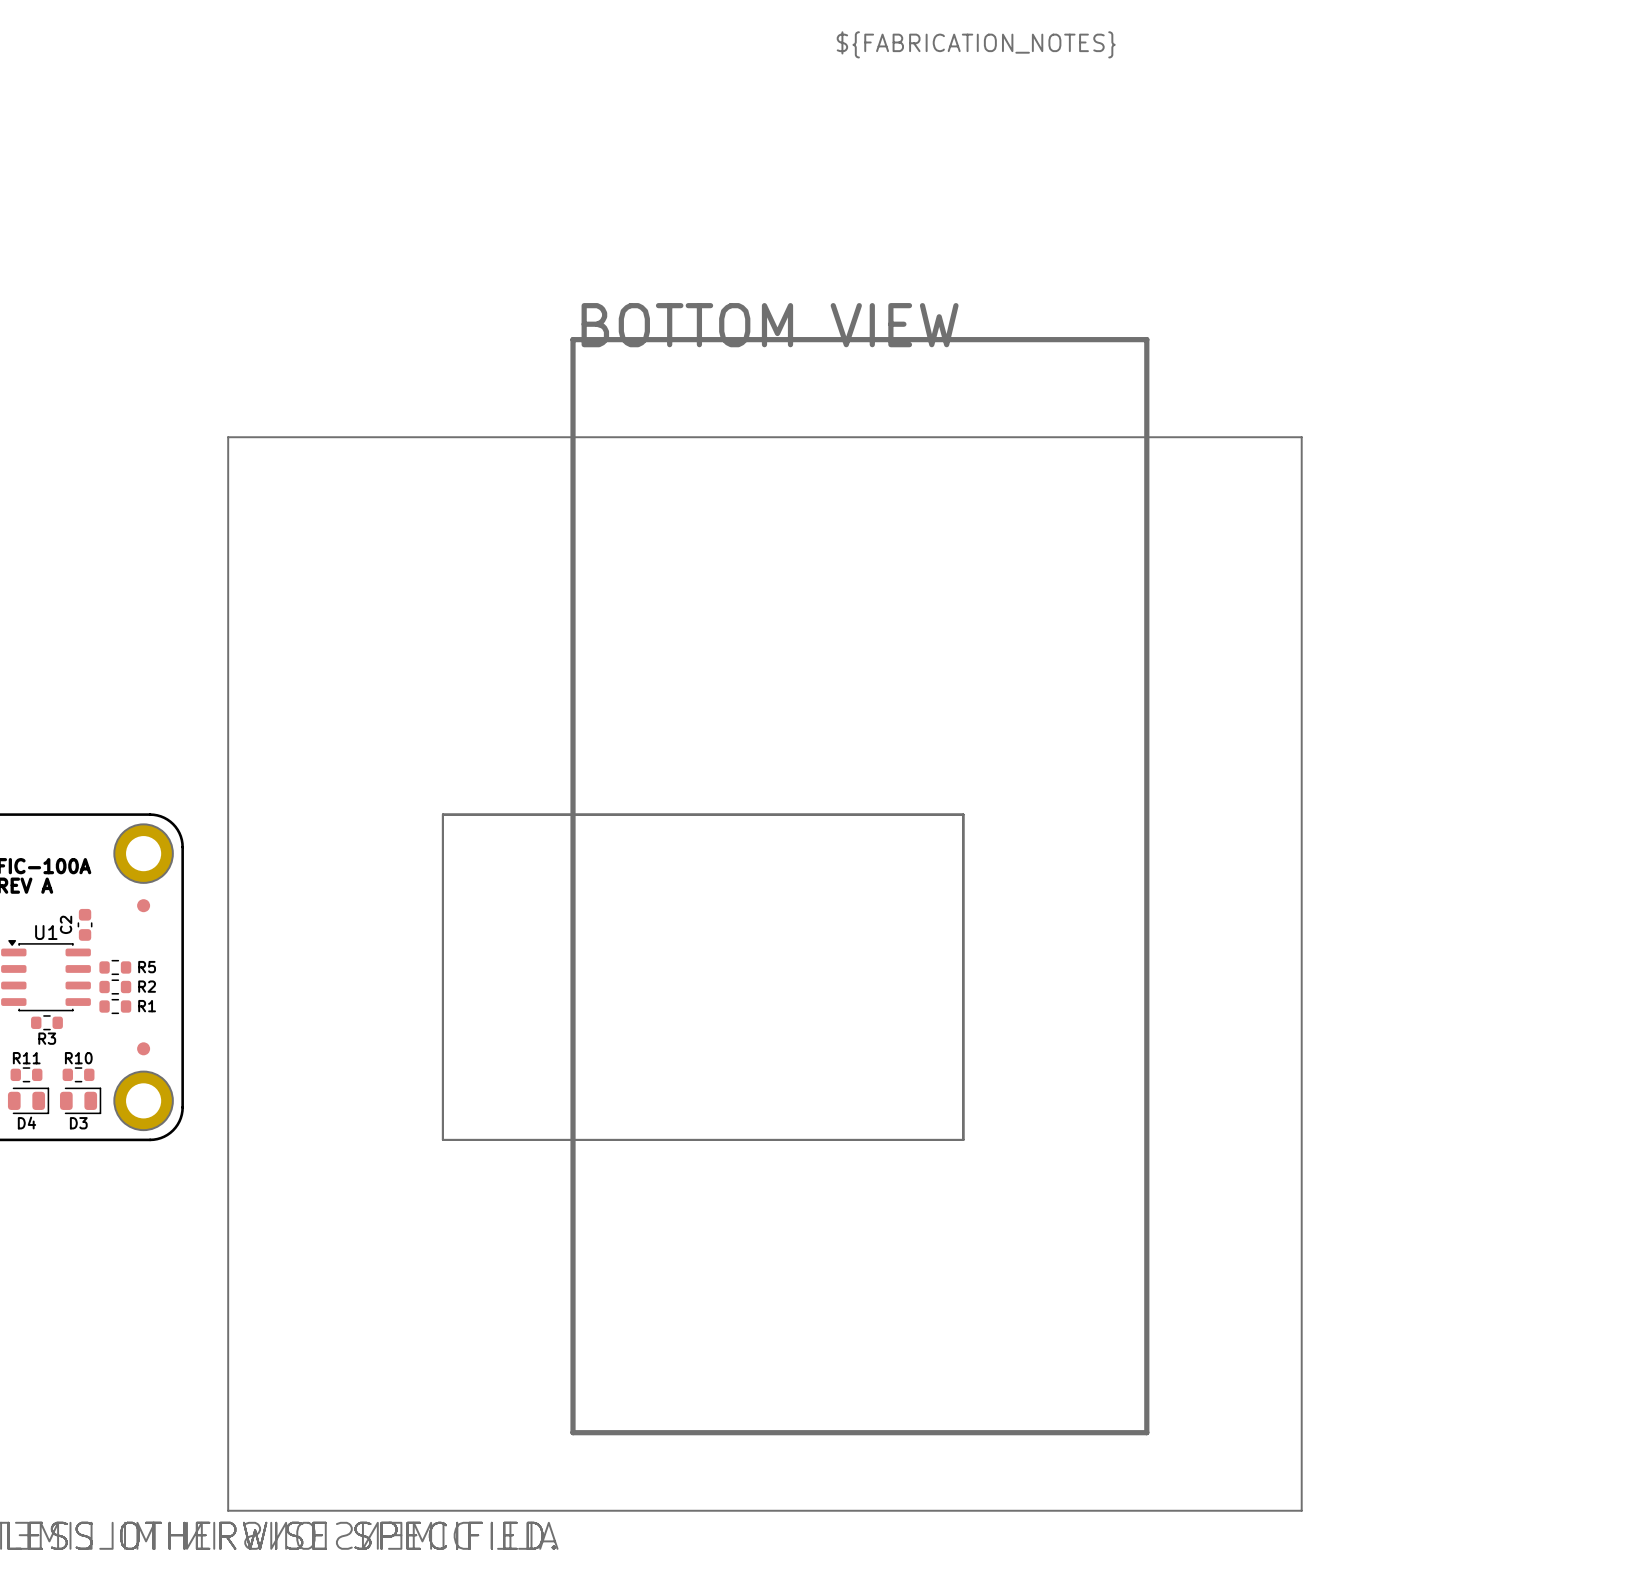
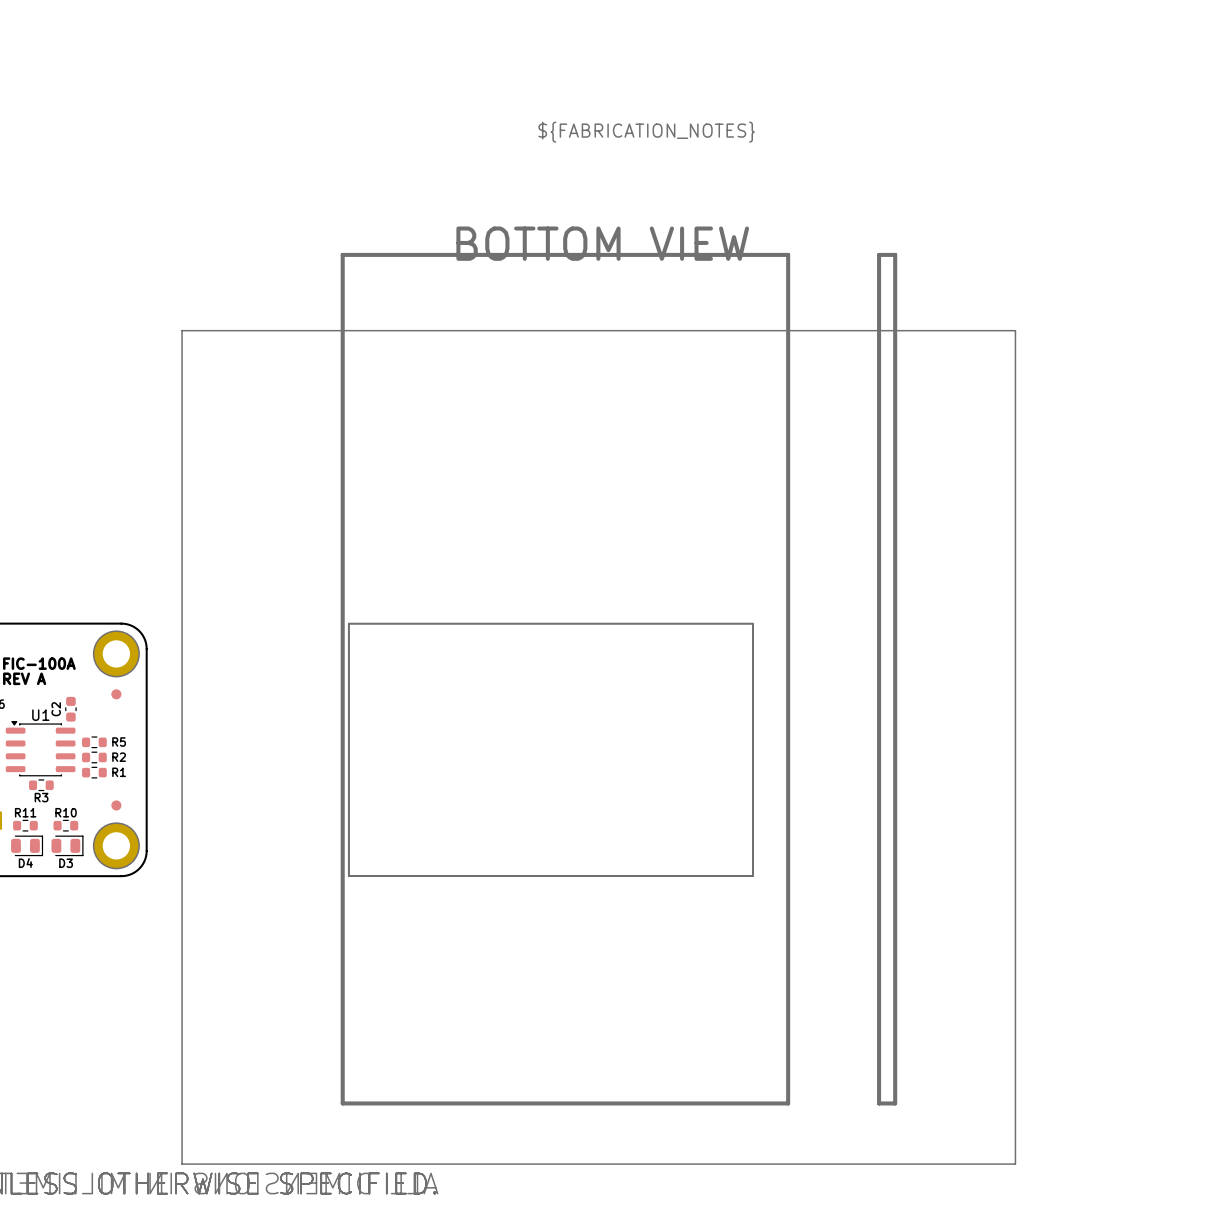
text position: ${FABRICATION_NOTES} (976, 44) -> ${FABRICATION_NOTES} (646, 132)
line: (573, 339) (573, 1432) -> (449, 254) (342, 254) (342, 1103) (449, 1103)
line: (1008, 339) (1126, 339) -> (788, 254) (788, 1103)
line: (1008, 1432) (1126, 1432) -> (879, 254) (879, 1103)

